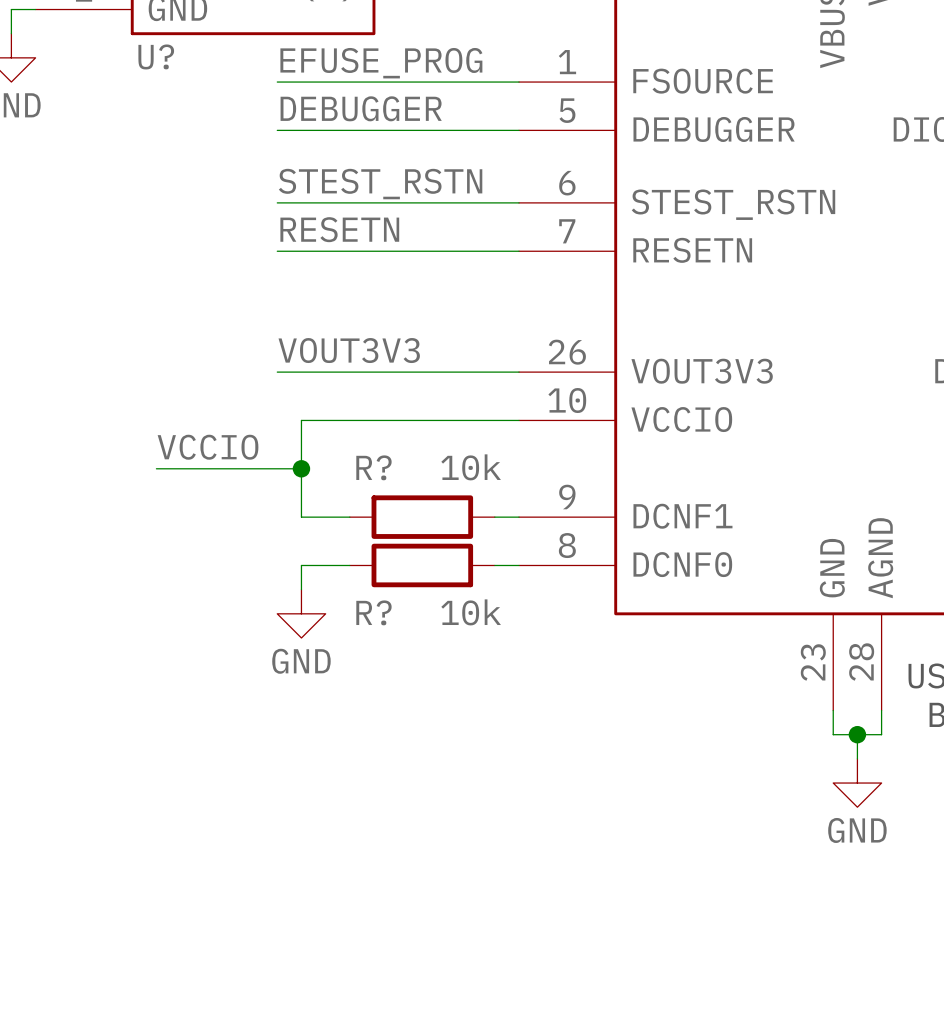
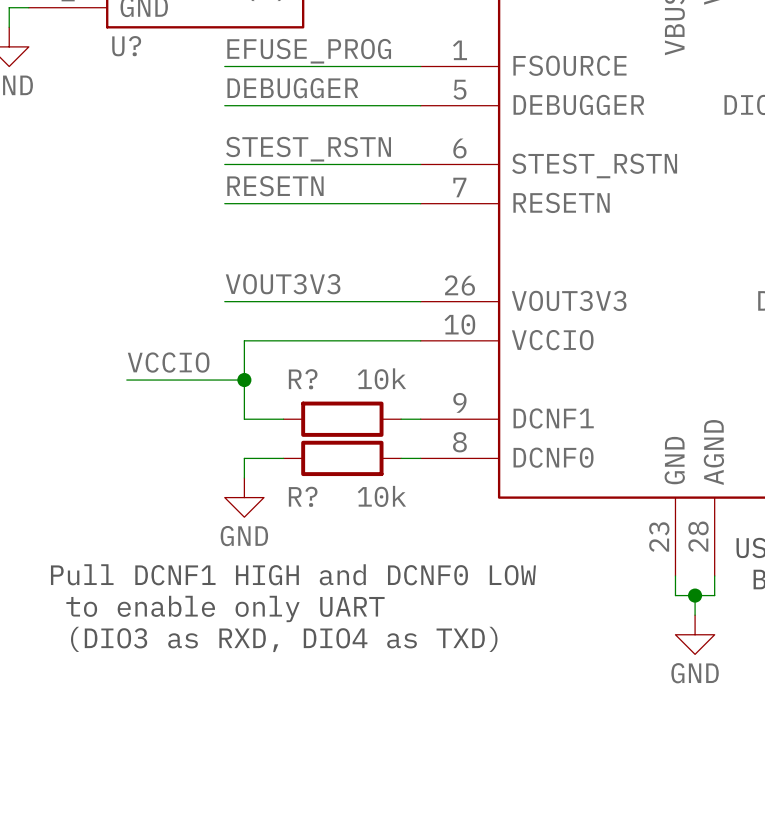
text: none -> Pull DCNF1 HIGH and DCNF0 LOW (293, 574)
text: none -> to enable only UART (225, 608)
text: none -> (DIO3 as RXD, DIO4 as TXD) (284, 639)

